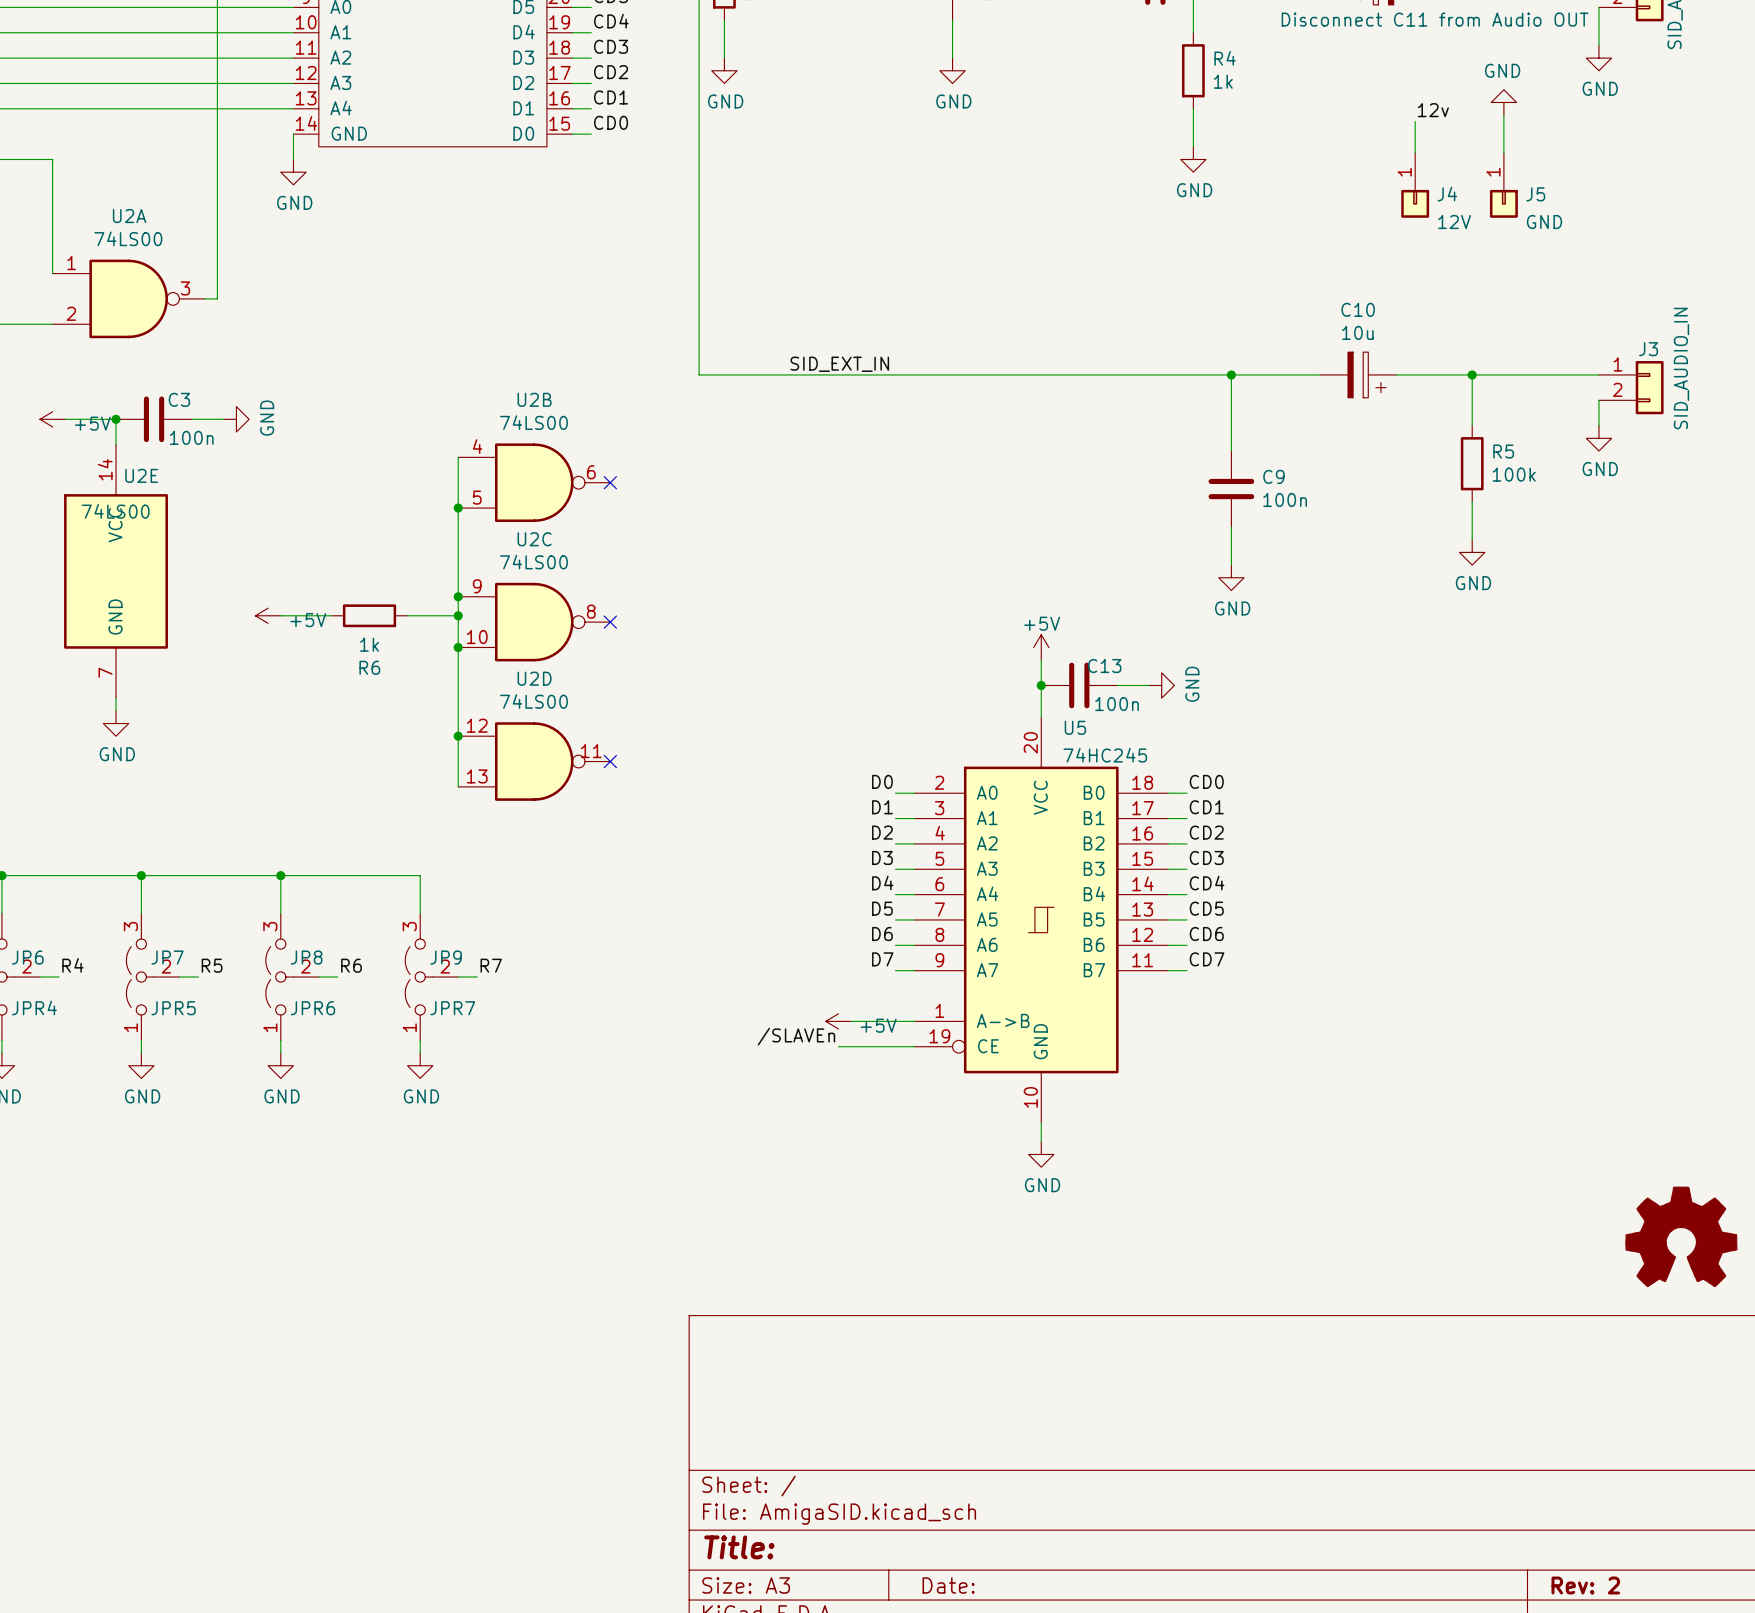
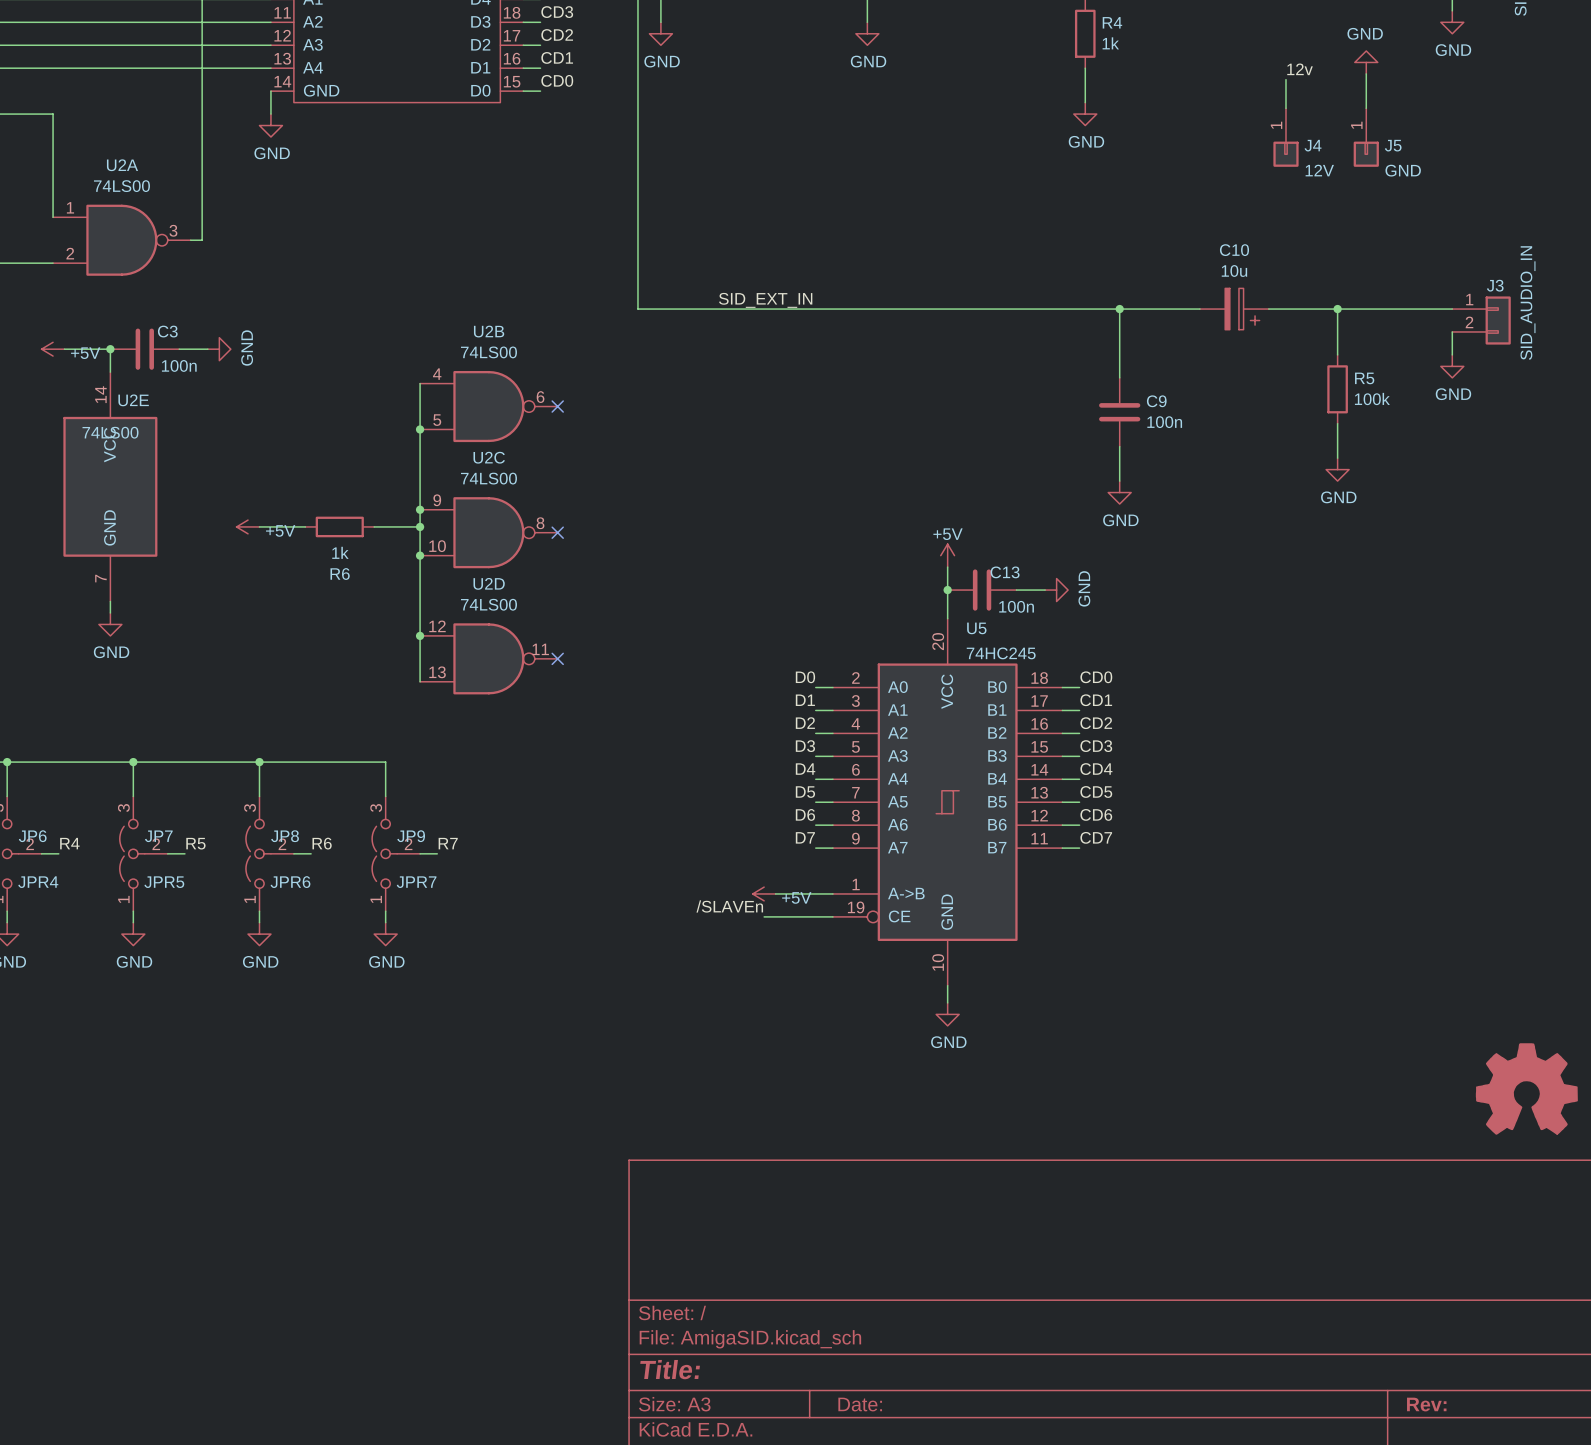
title block: Rev: 2 (1585, 1585) -> Rev: (1426, 1404)

